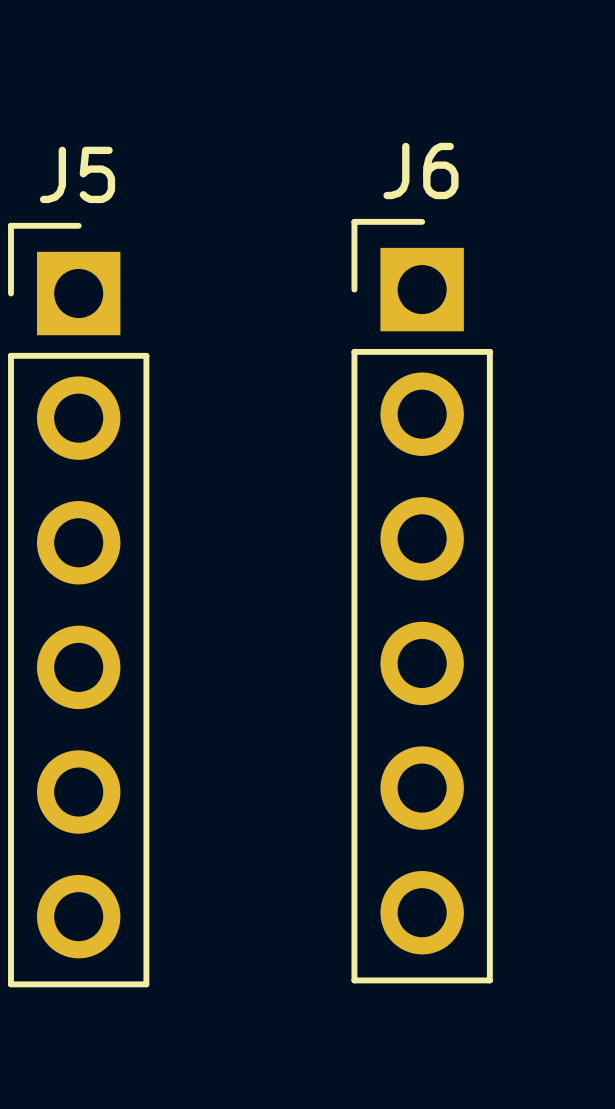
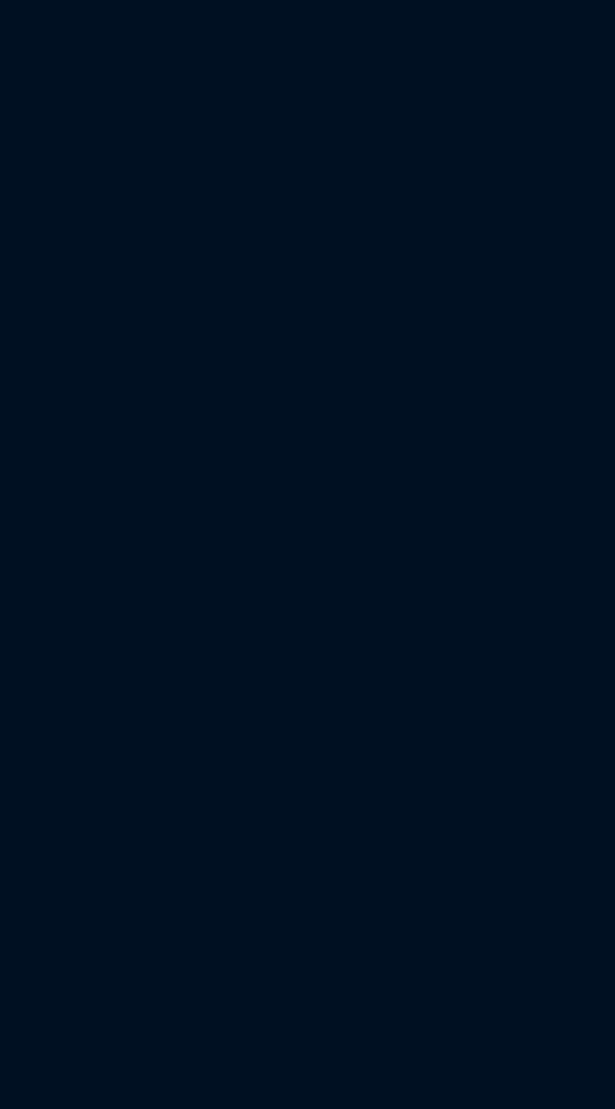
J6: (422, 601) -> none
J5: (78, 605) -> none

